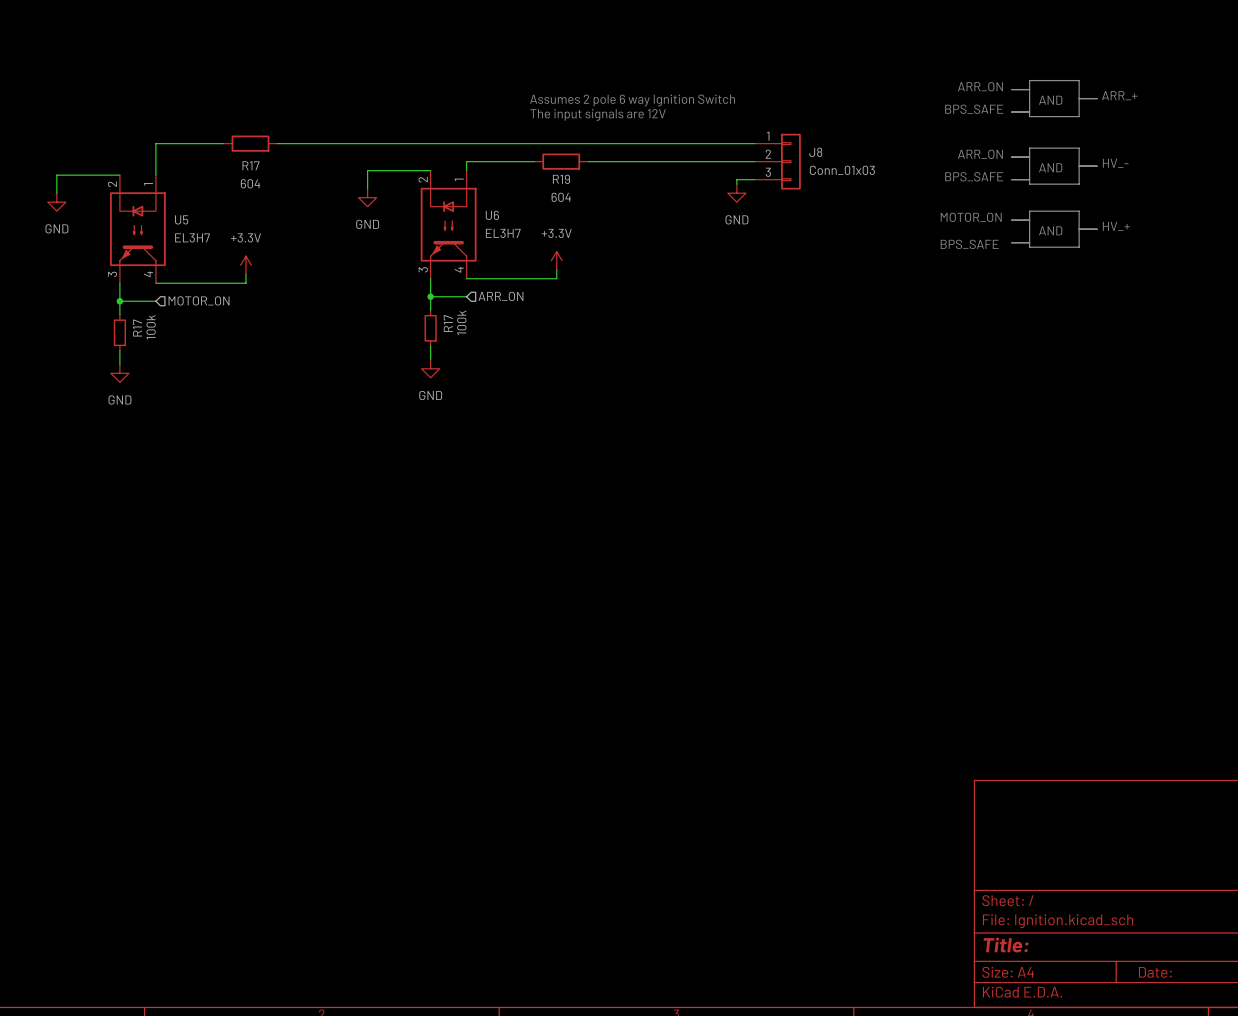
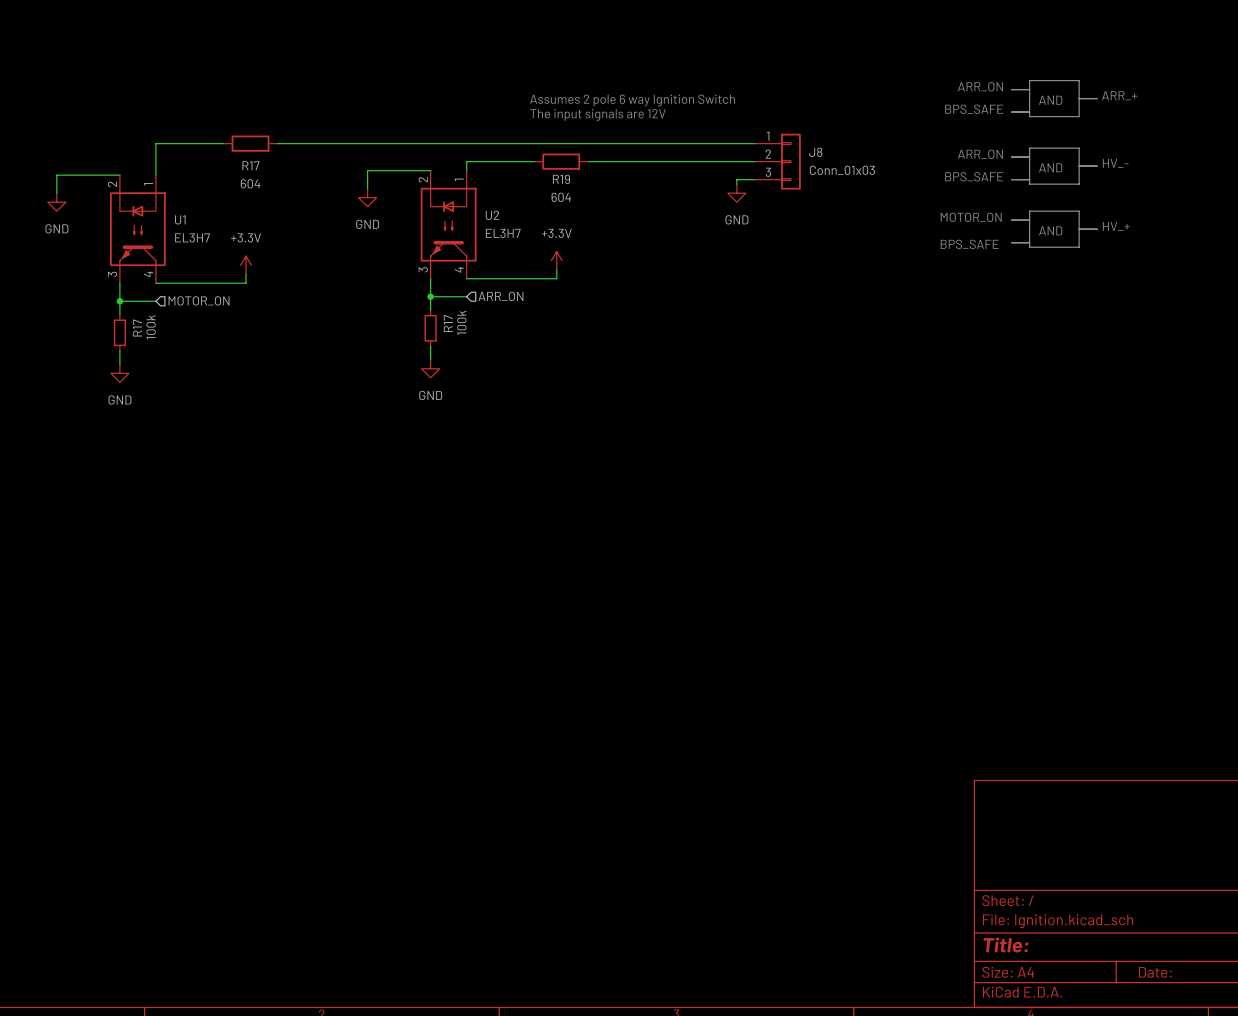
U6 name: U6 (492, 215) -> U2 (492, 215)
U5 name: U5 (181, 219) -> U1 (180, 219)

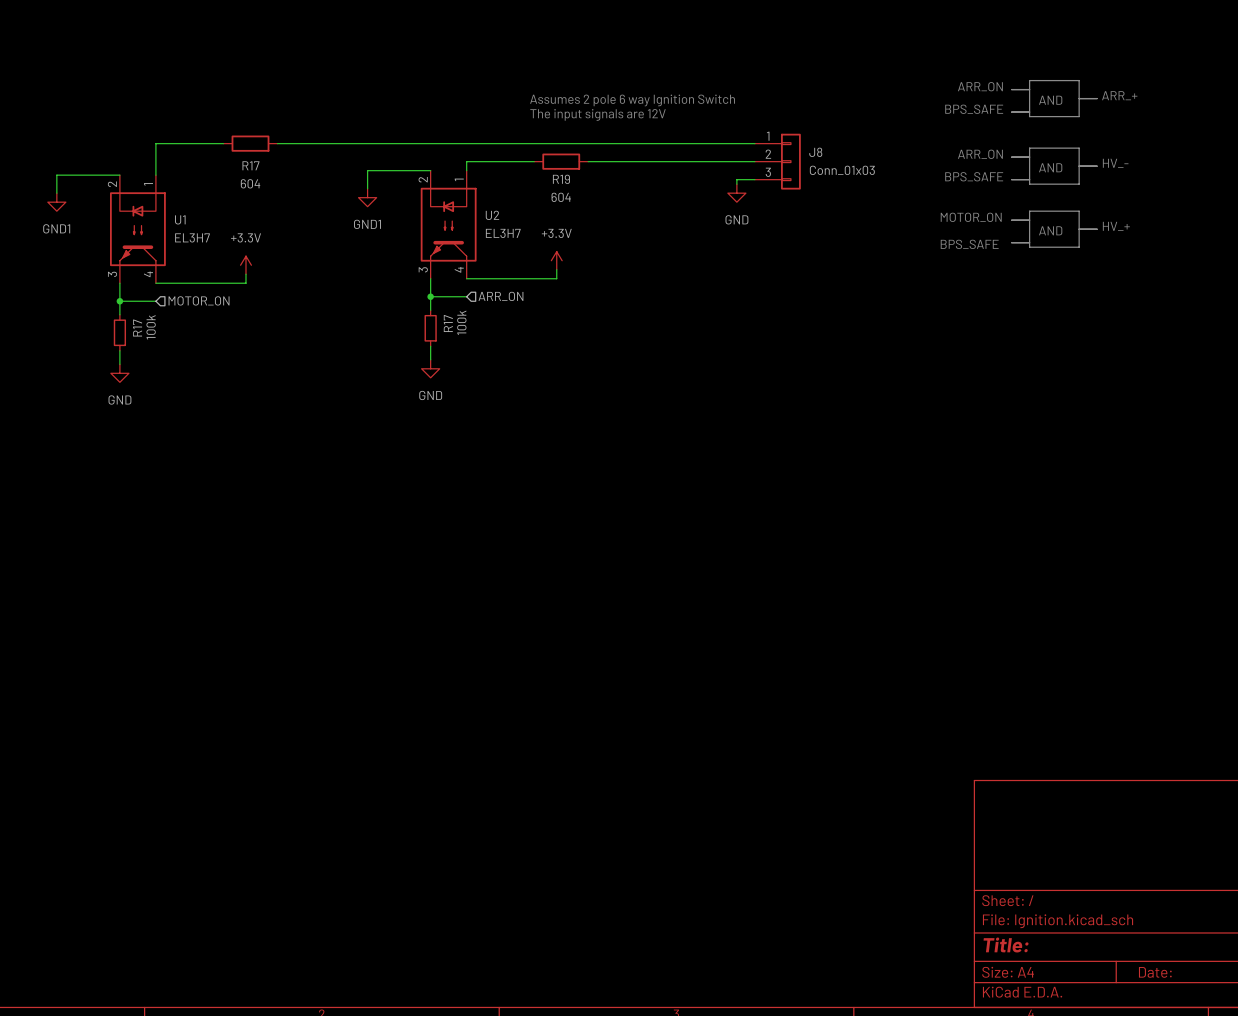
power symbol: GND (367, 197) -> GND1 (367, 197)
power symbol: GND (56, 202) -> GND1 (56, 202)

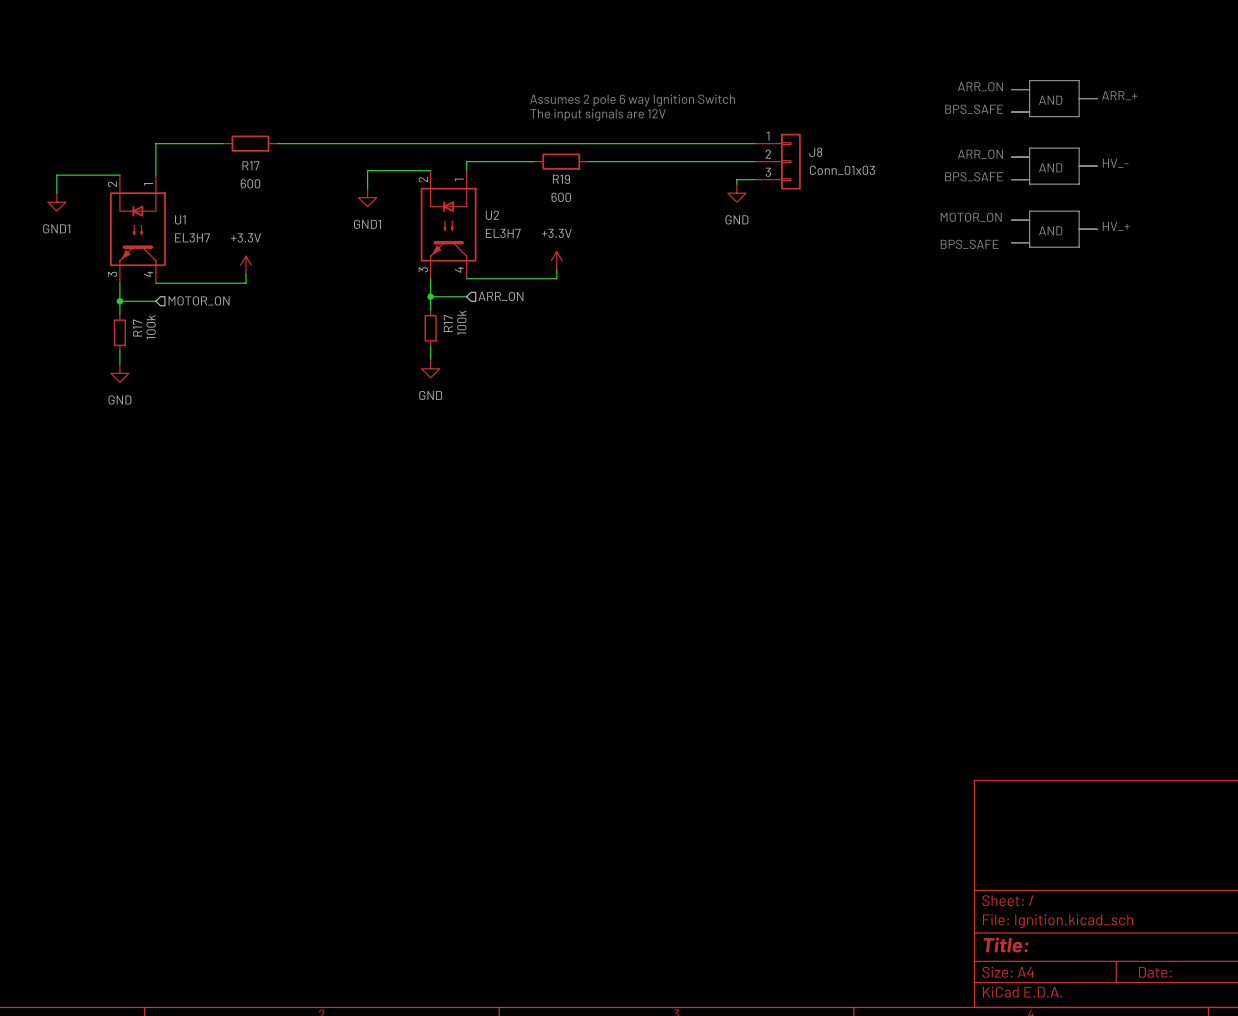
R17 value: 604 (250, 183) -> 600 (250, 183)
R19 value: 604 (561, 197) -> 600 (561, 197)

